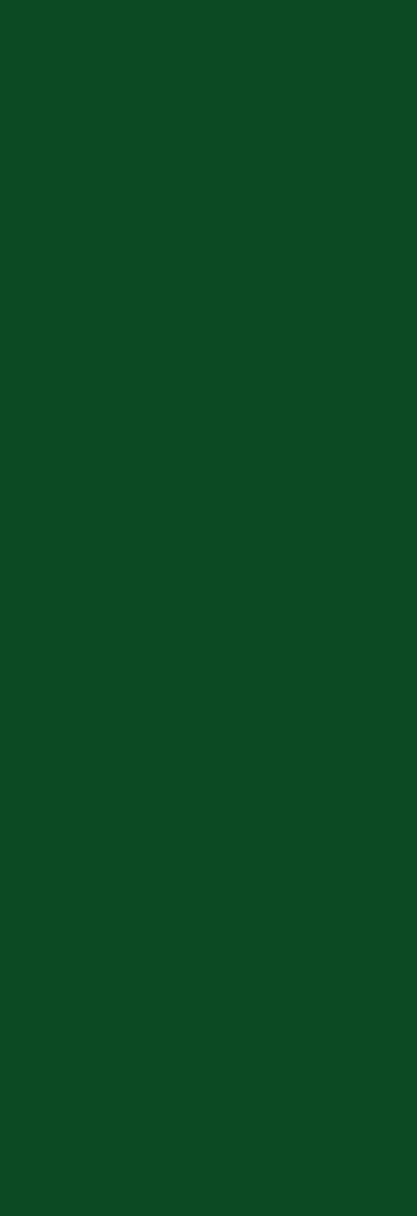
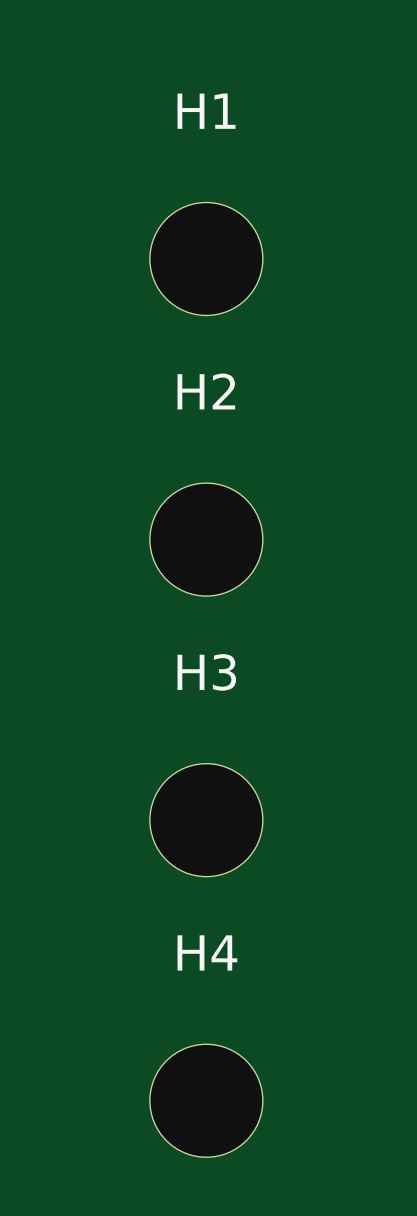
H1: none -> (206, 259)
H2: none -> (206, 539)
H3: none -> (206, 820)
H4: none -> (206, 1100)

